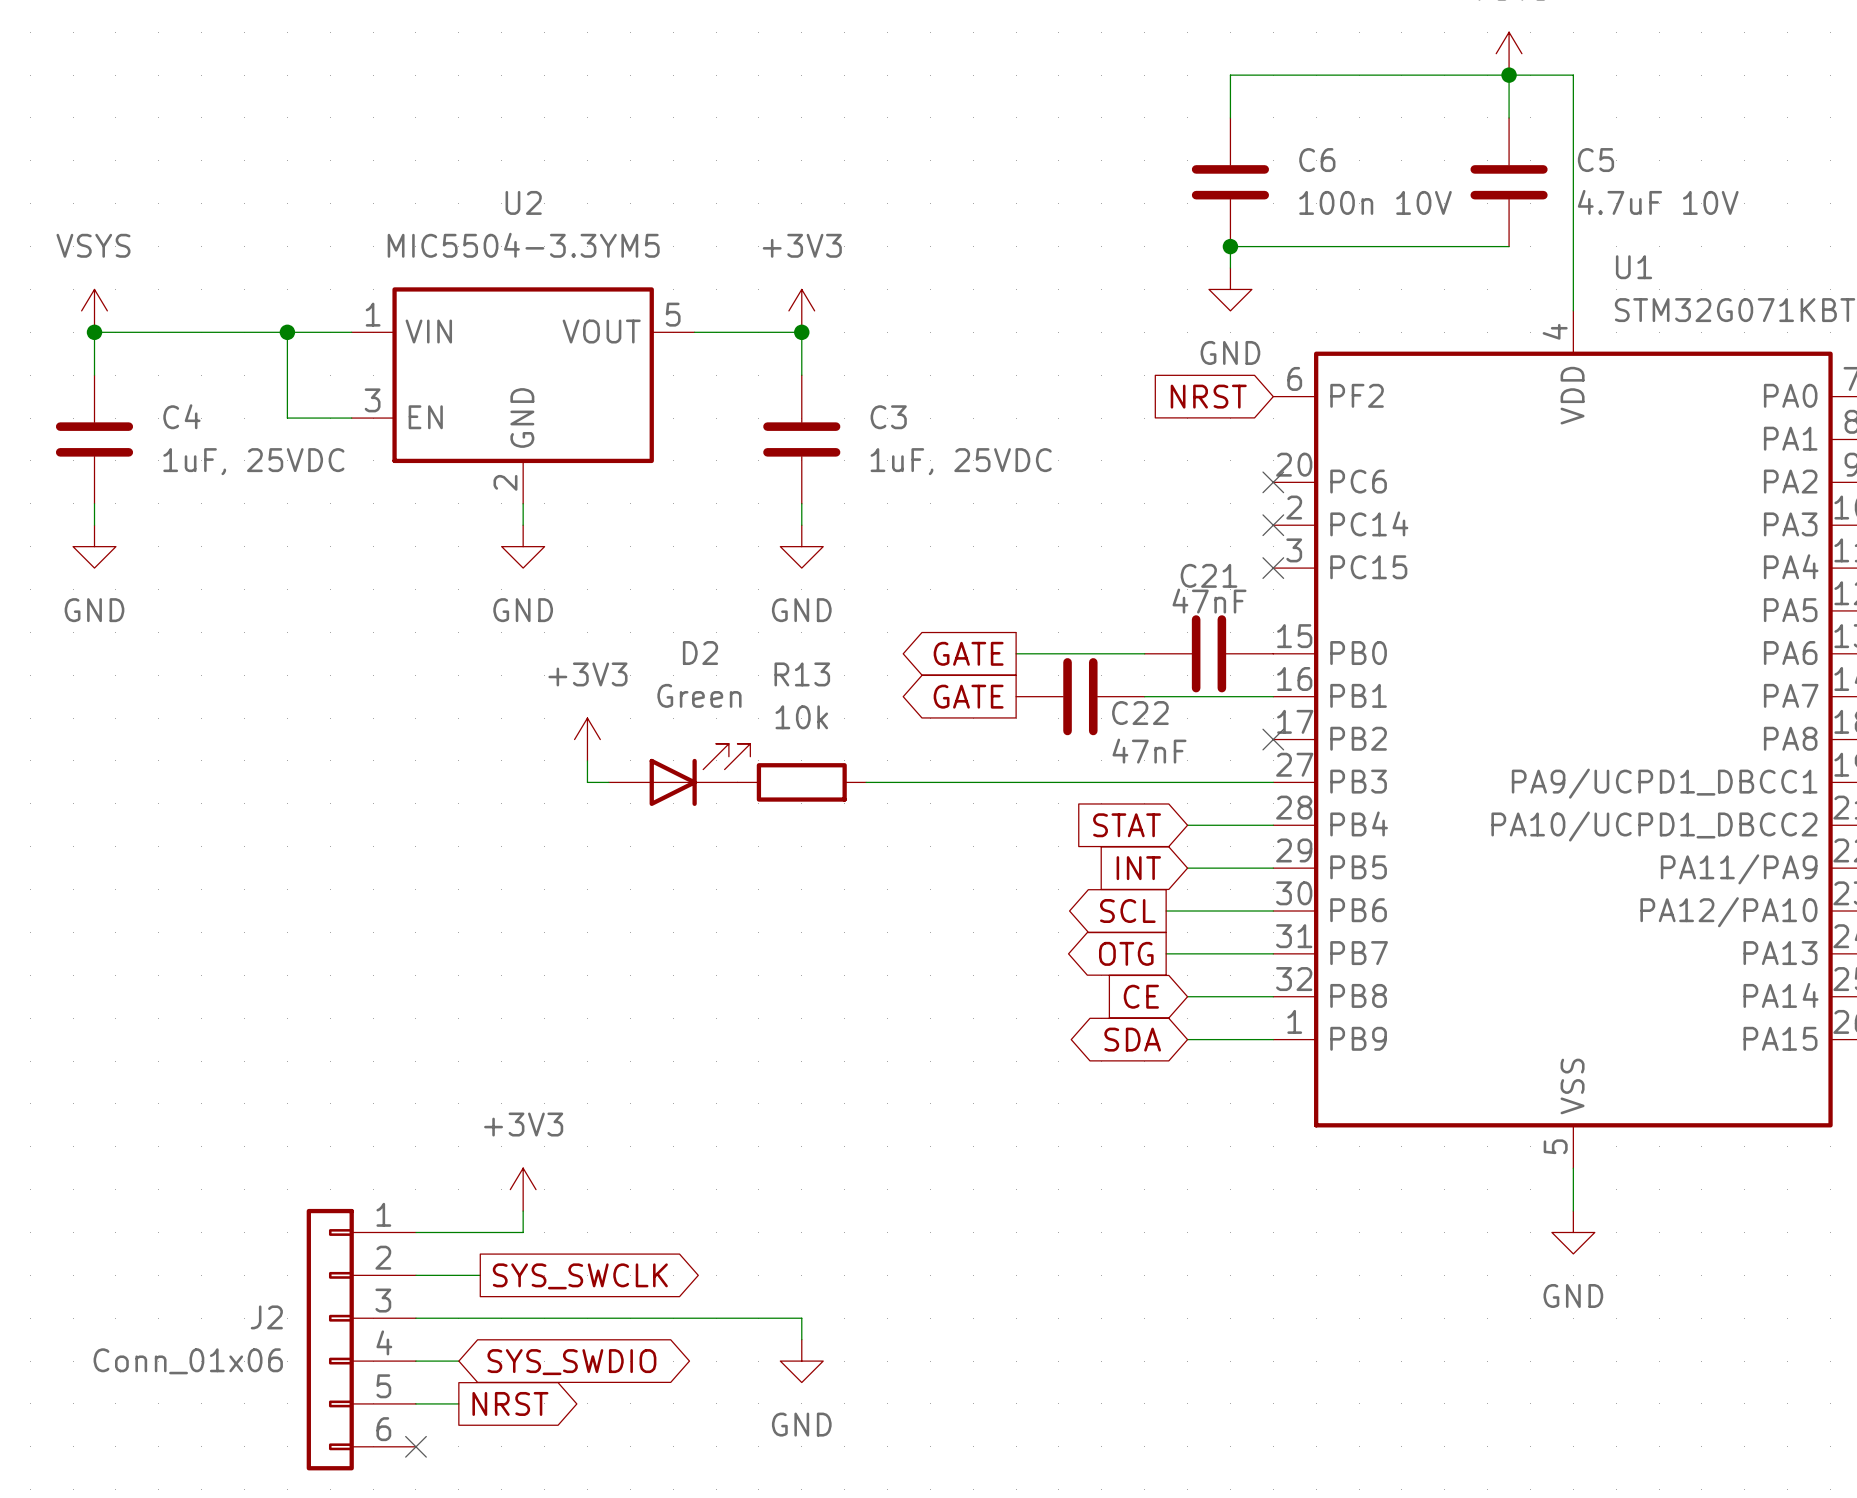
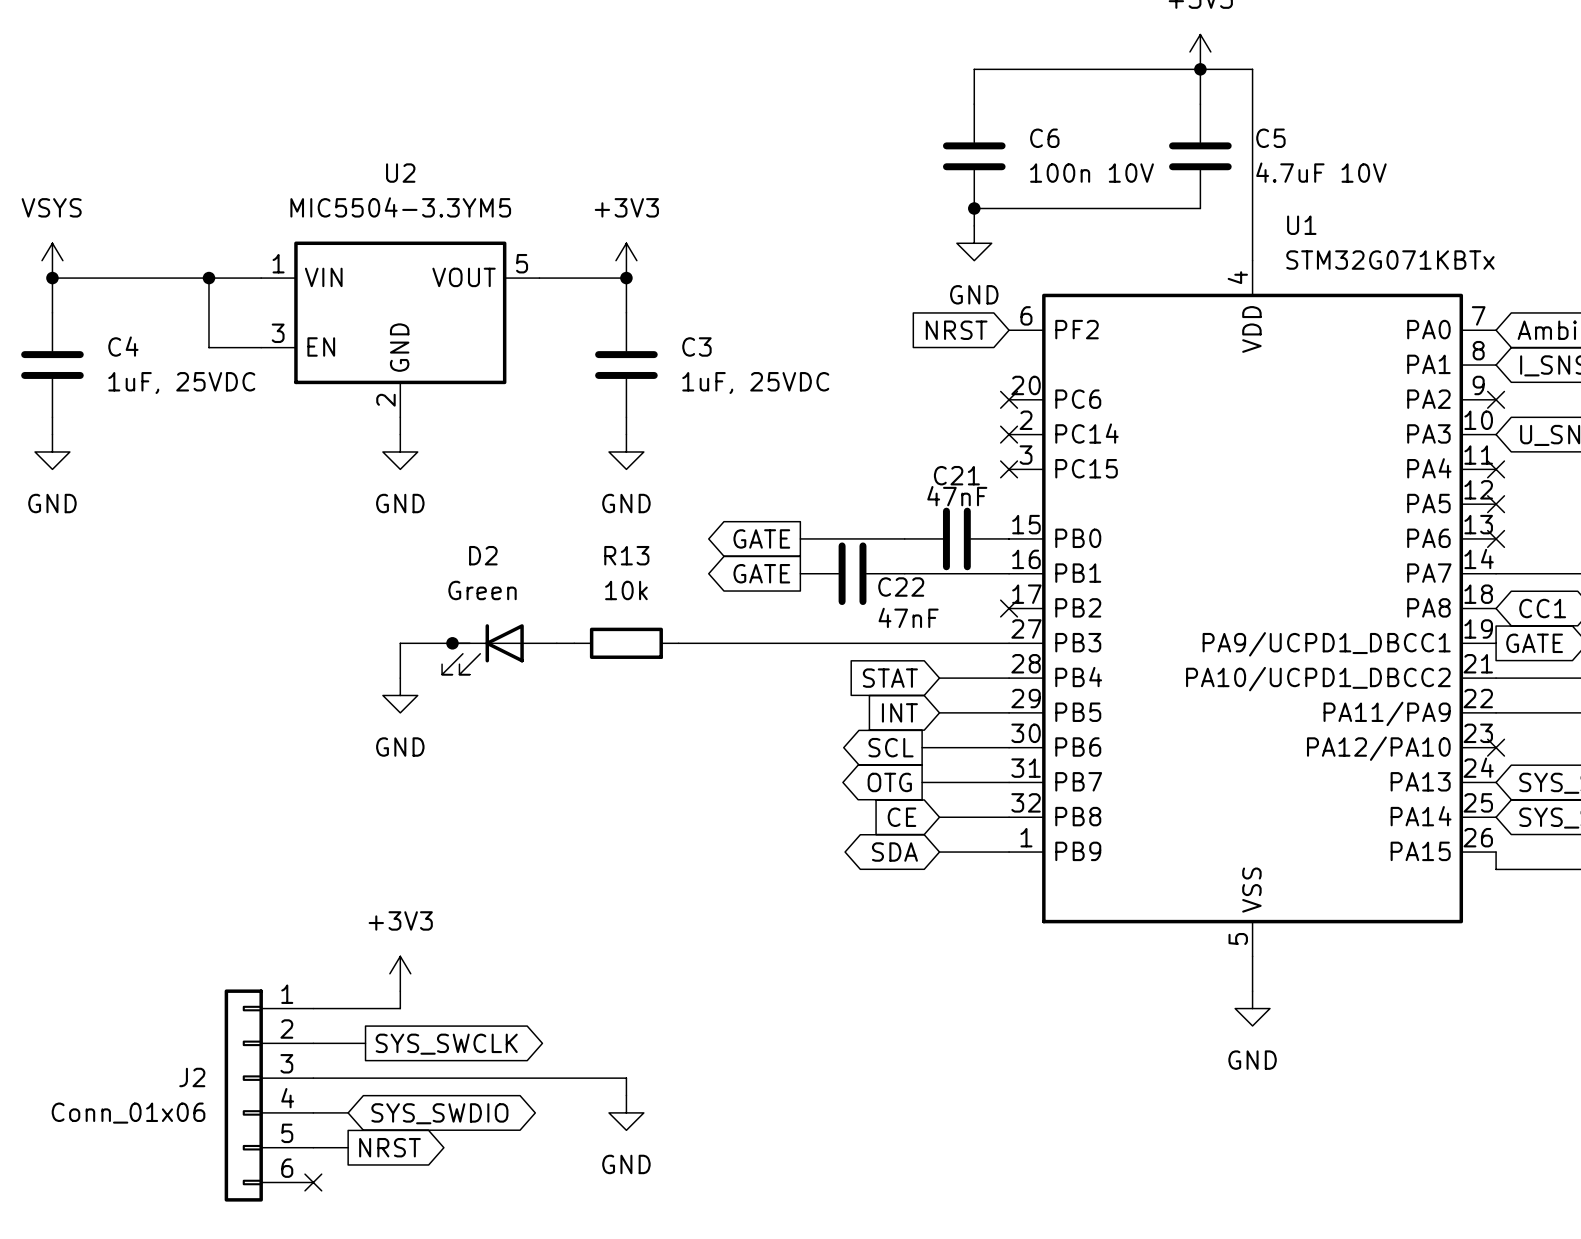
D2 name position: D2 (700, 653) -> D2 (483, 555)
D2 value position: Green (699, 695) -> Green (482, 590)
power symbol: +3V3 (587, 739) -> none
wire: (587, 760) (587, 782) -> (400, 678) (400, 643) (452, 643)
D2 rotation: 0° (699, 774) -> 180° (482, 649)
junction: none -> (452, 643)
power symbol: none -> GND (400, 695)

